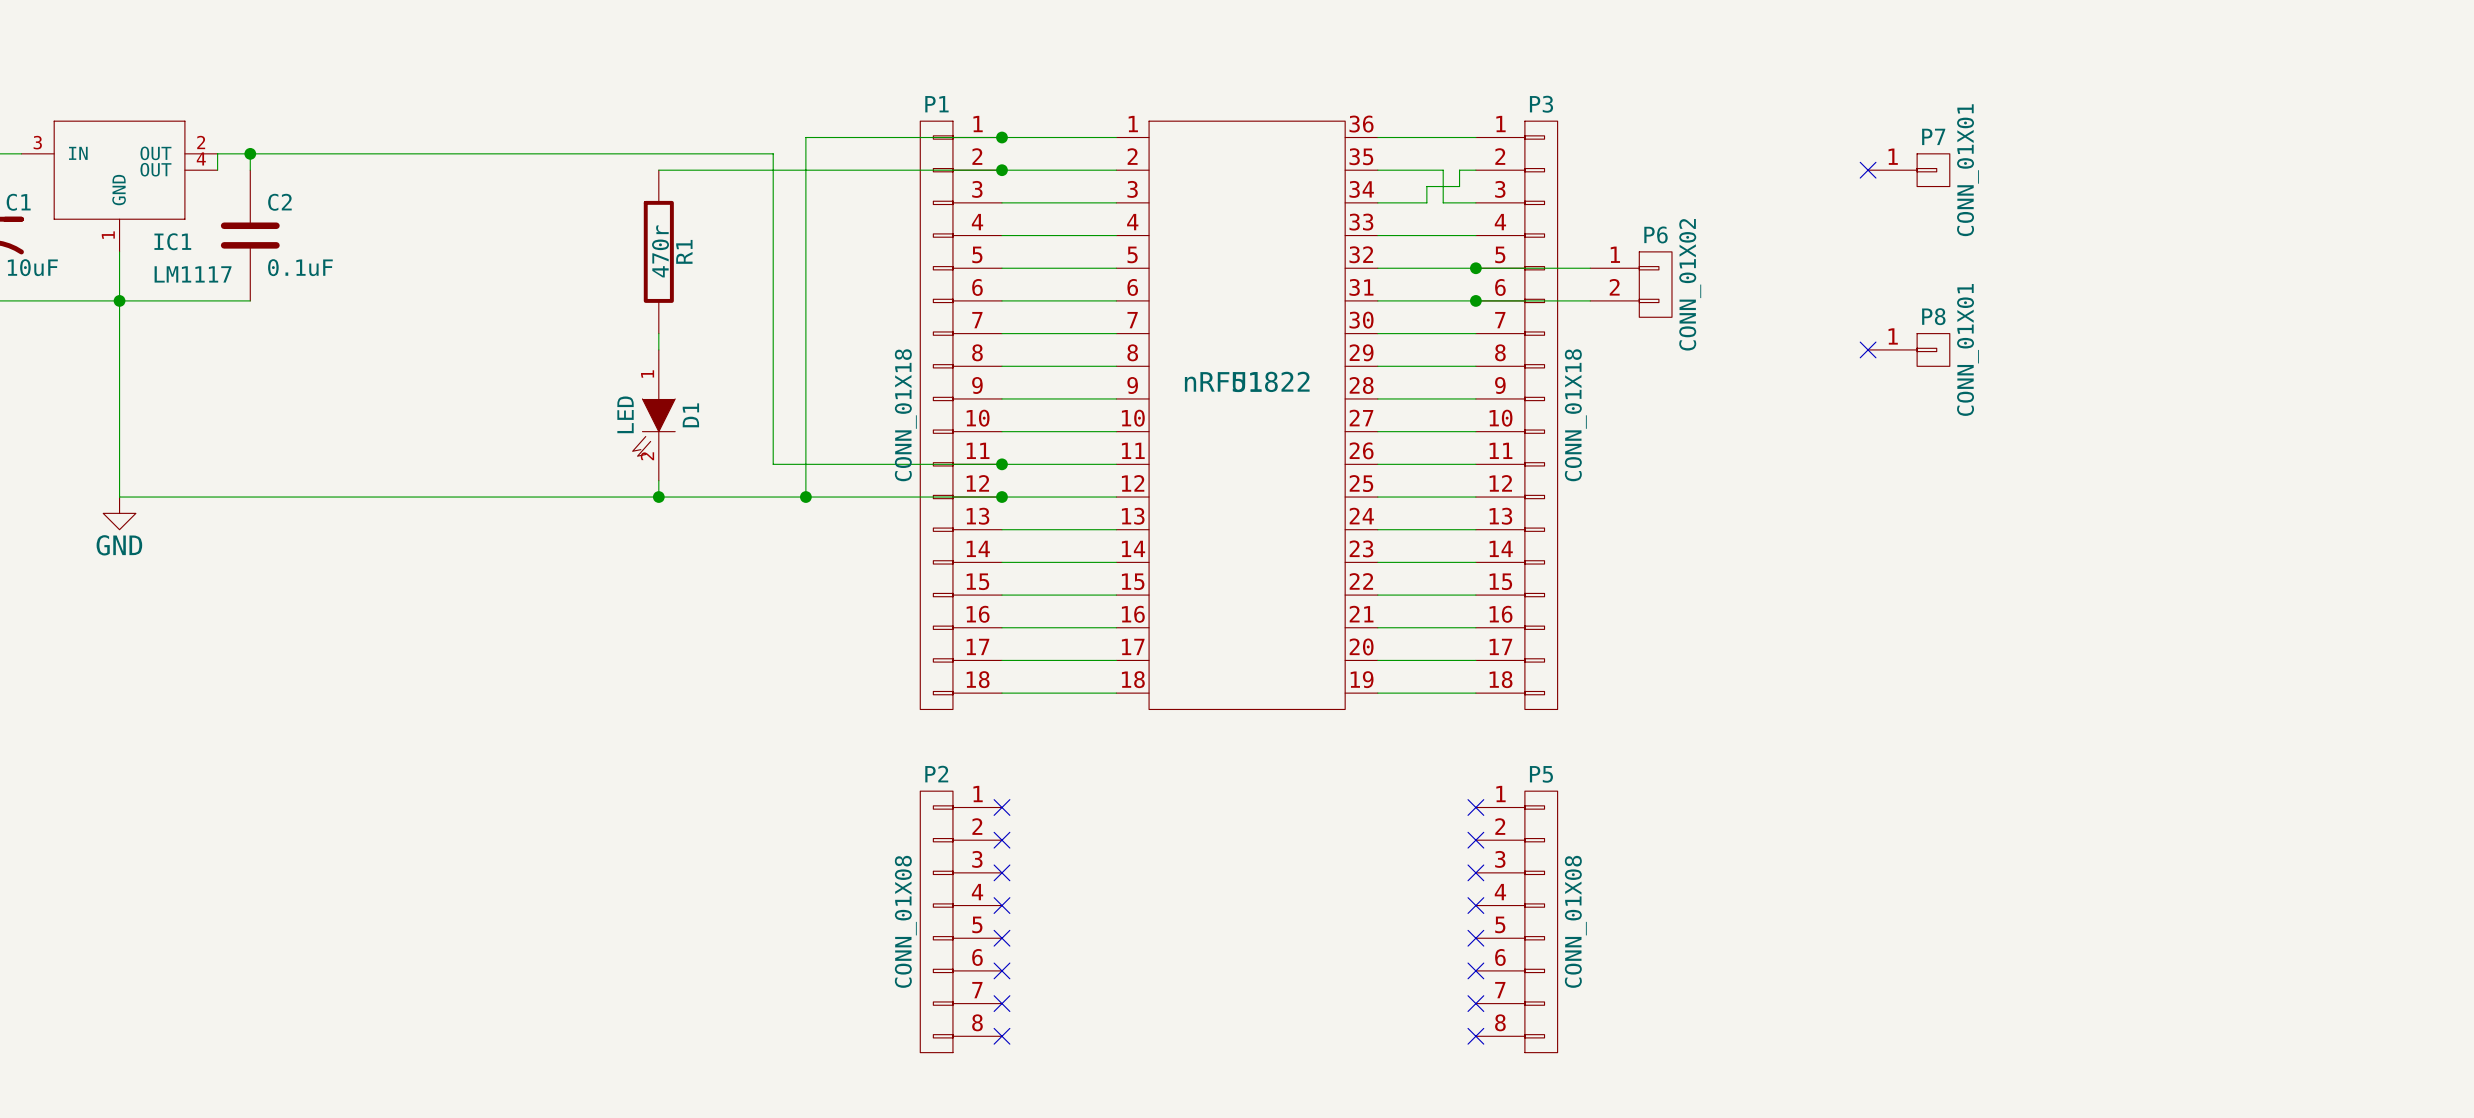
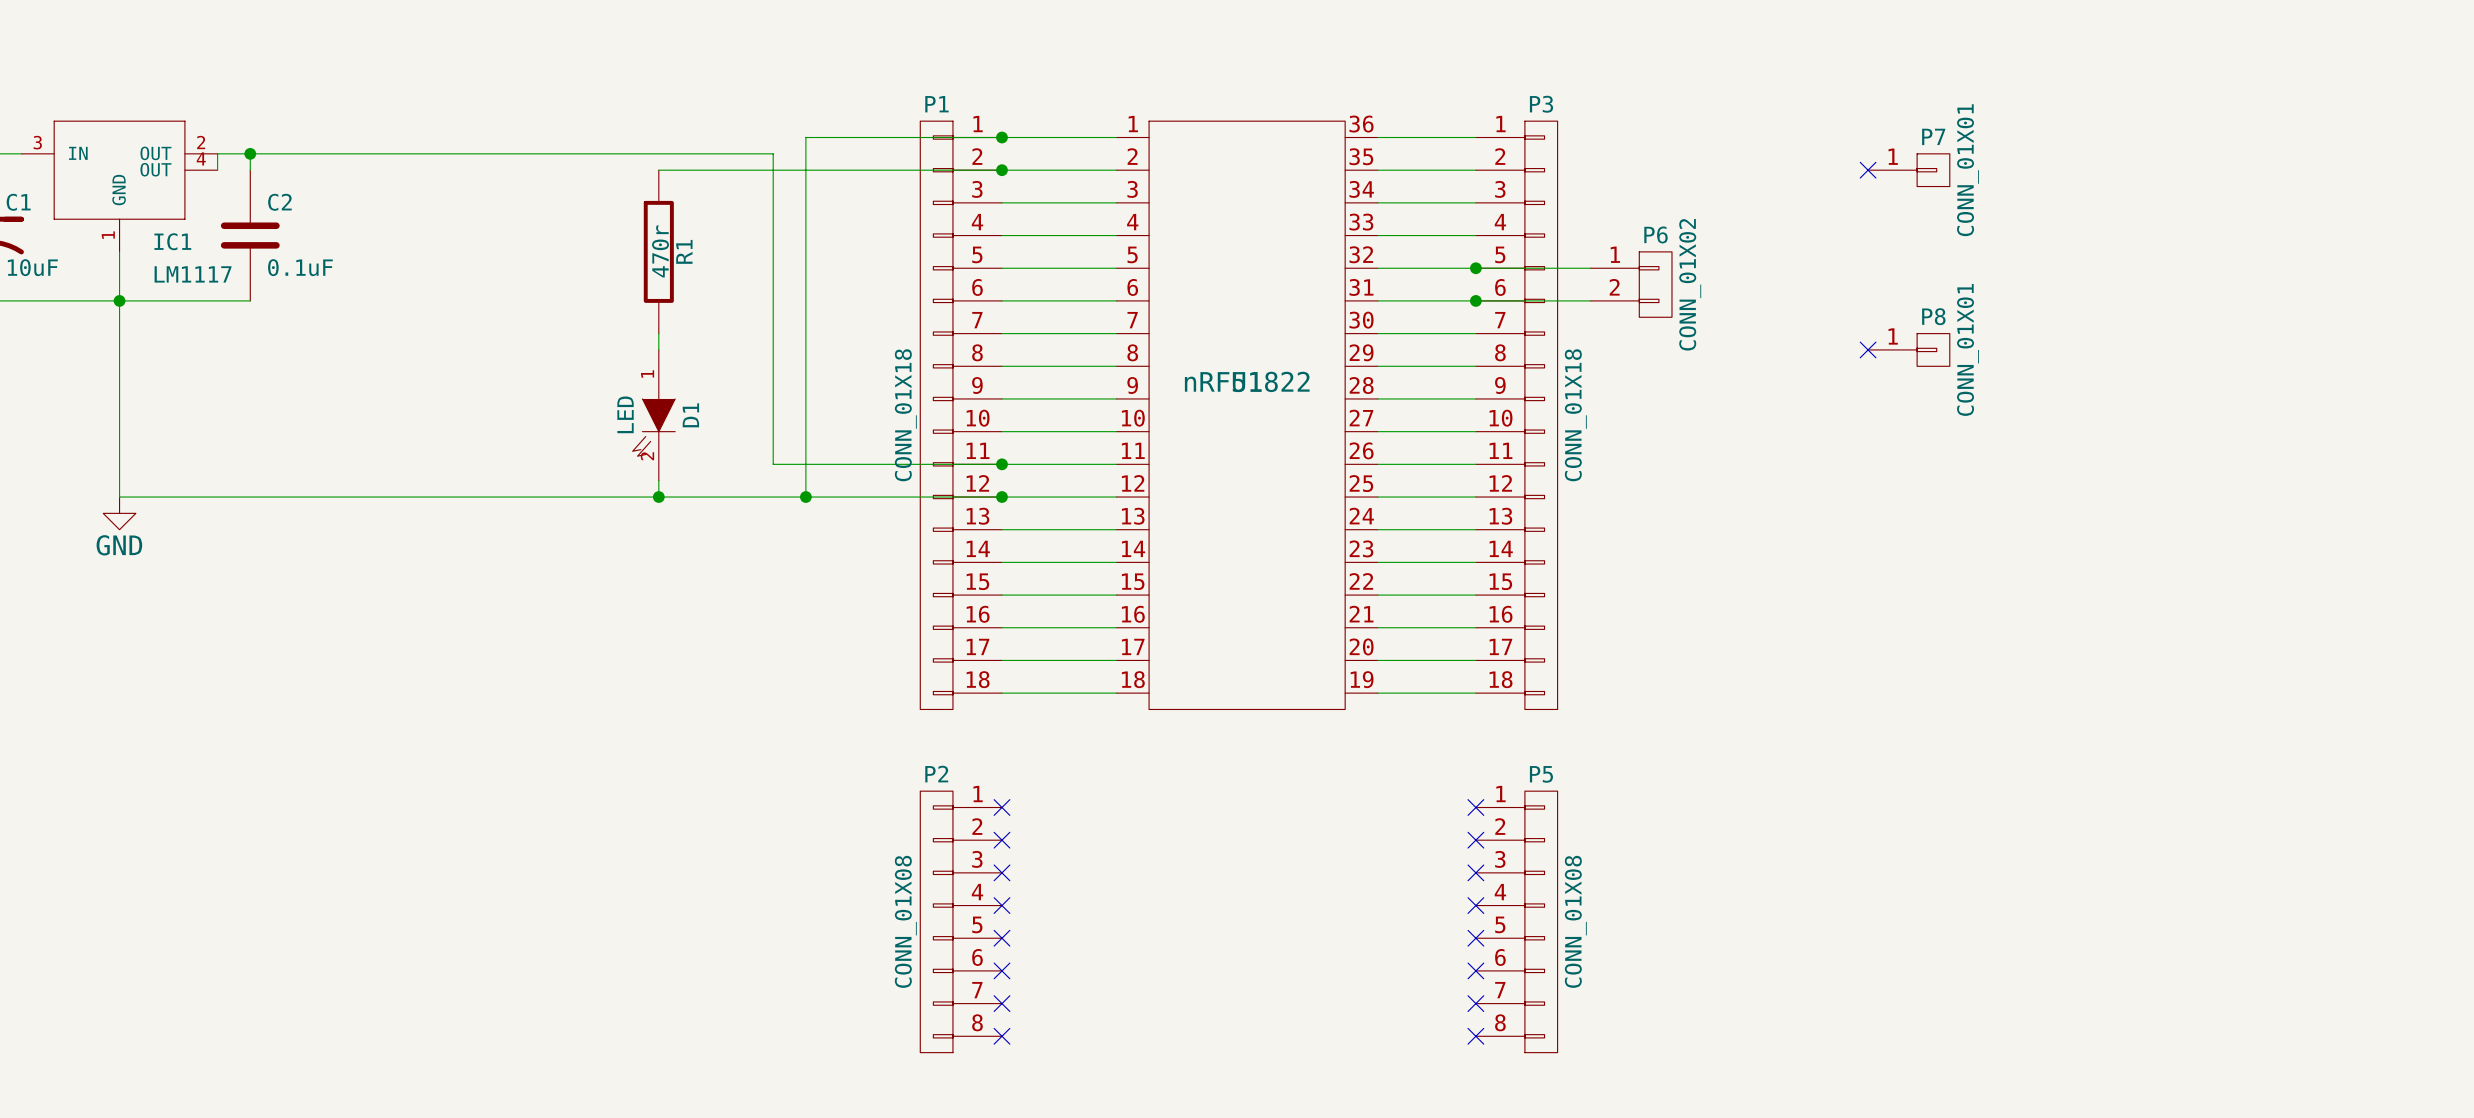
wire: (1443, 170) (1443, 202) -> (1443, 170) (1459, 170)
wire: (1459, 170) (1459, 186) (1426, 186) (1426, 202) -> (1443, 202) (1426, 202)

